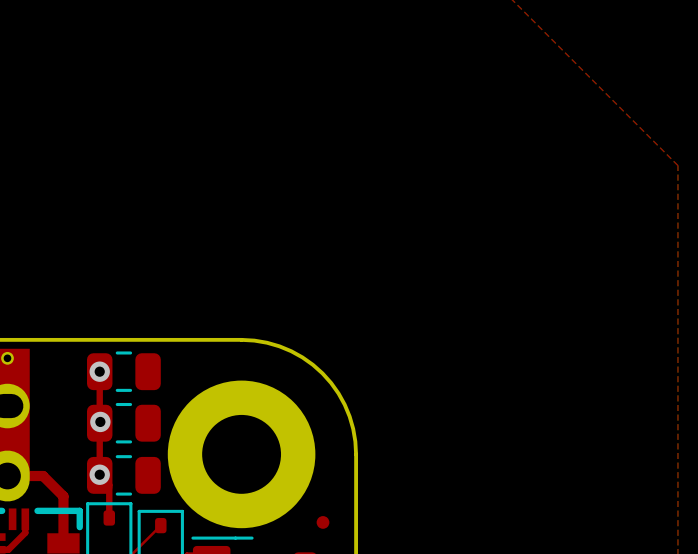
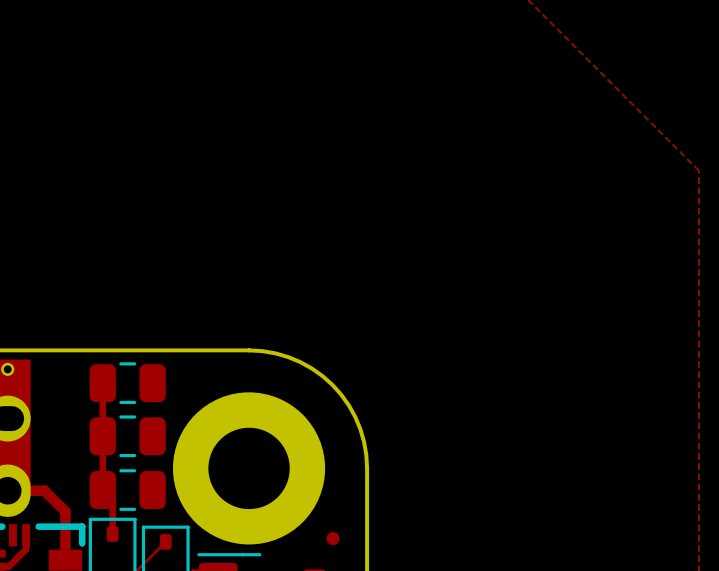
via: (99, 371) -> none
via: (100, 421) -> none
via: (99, 474) -> none

